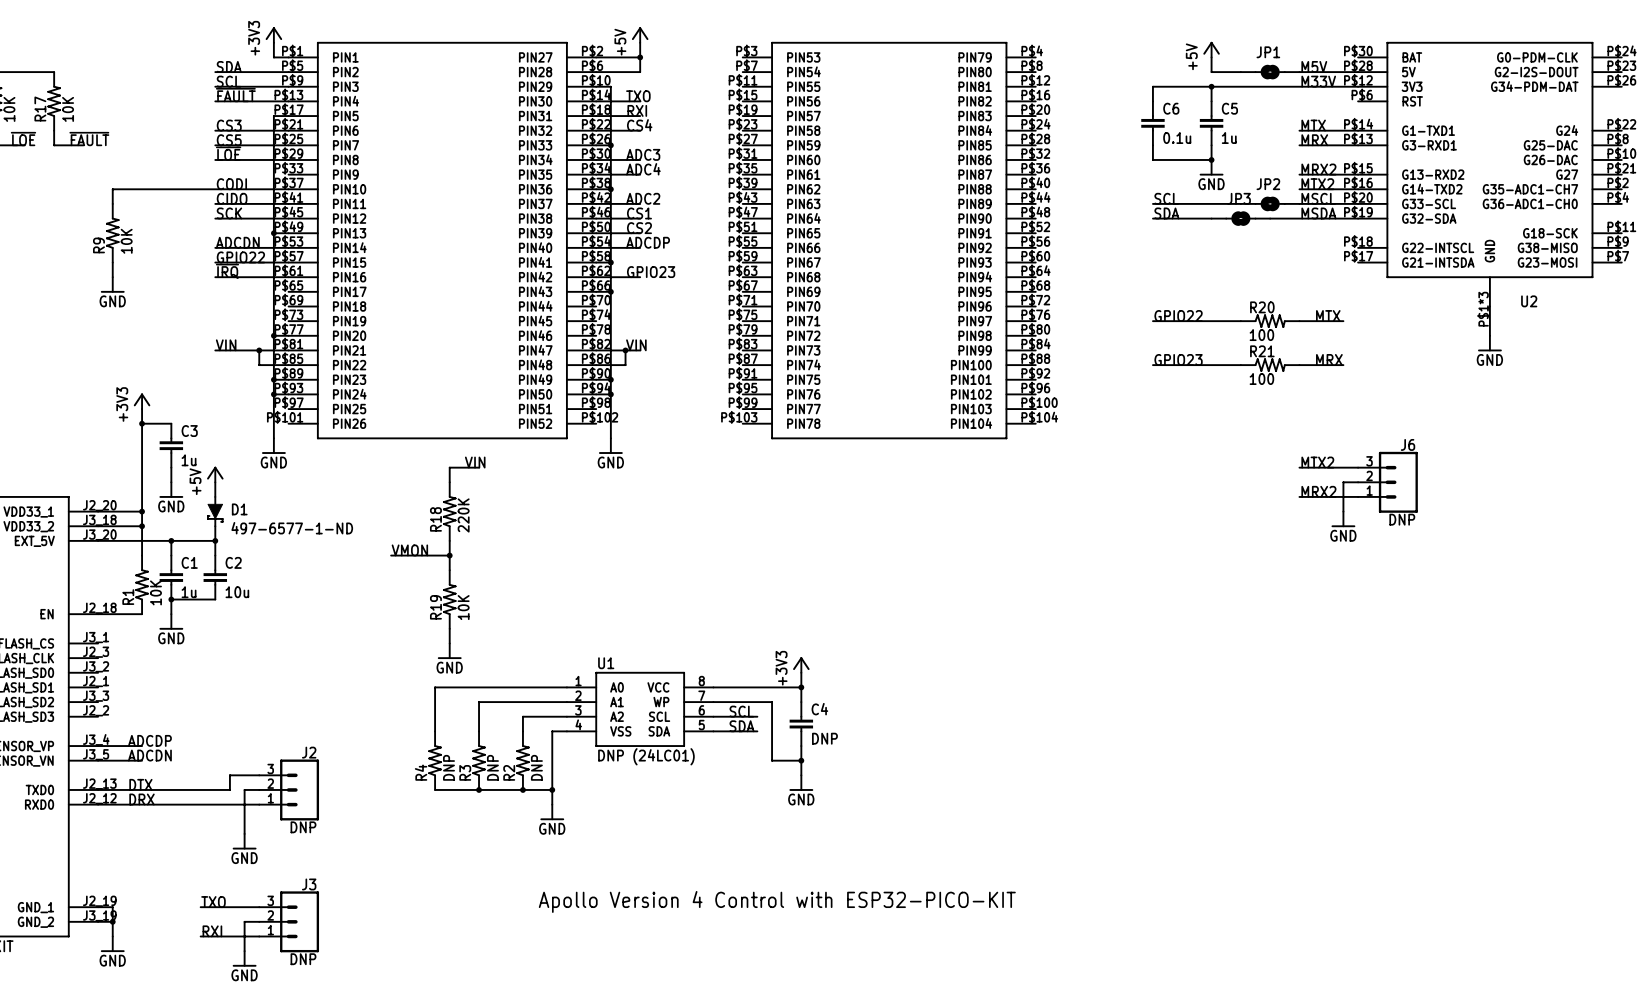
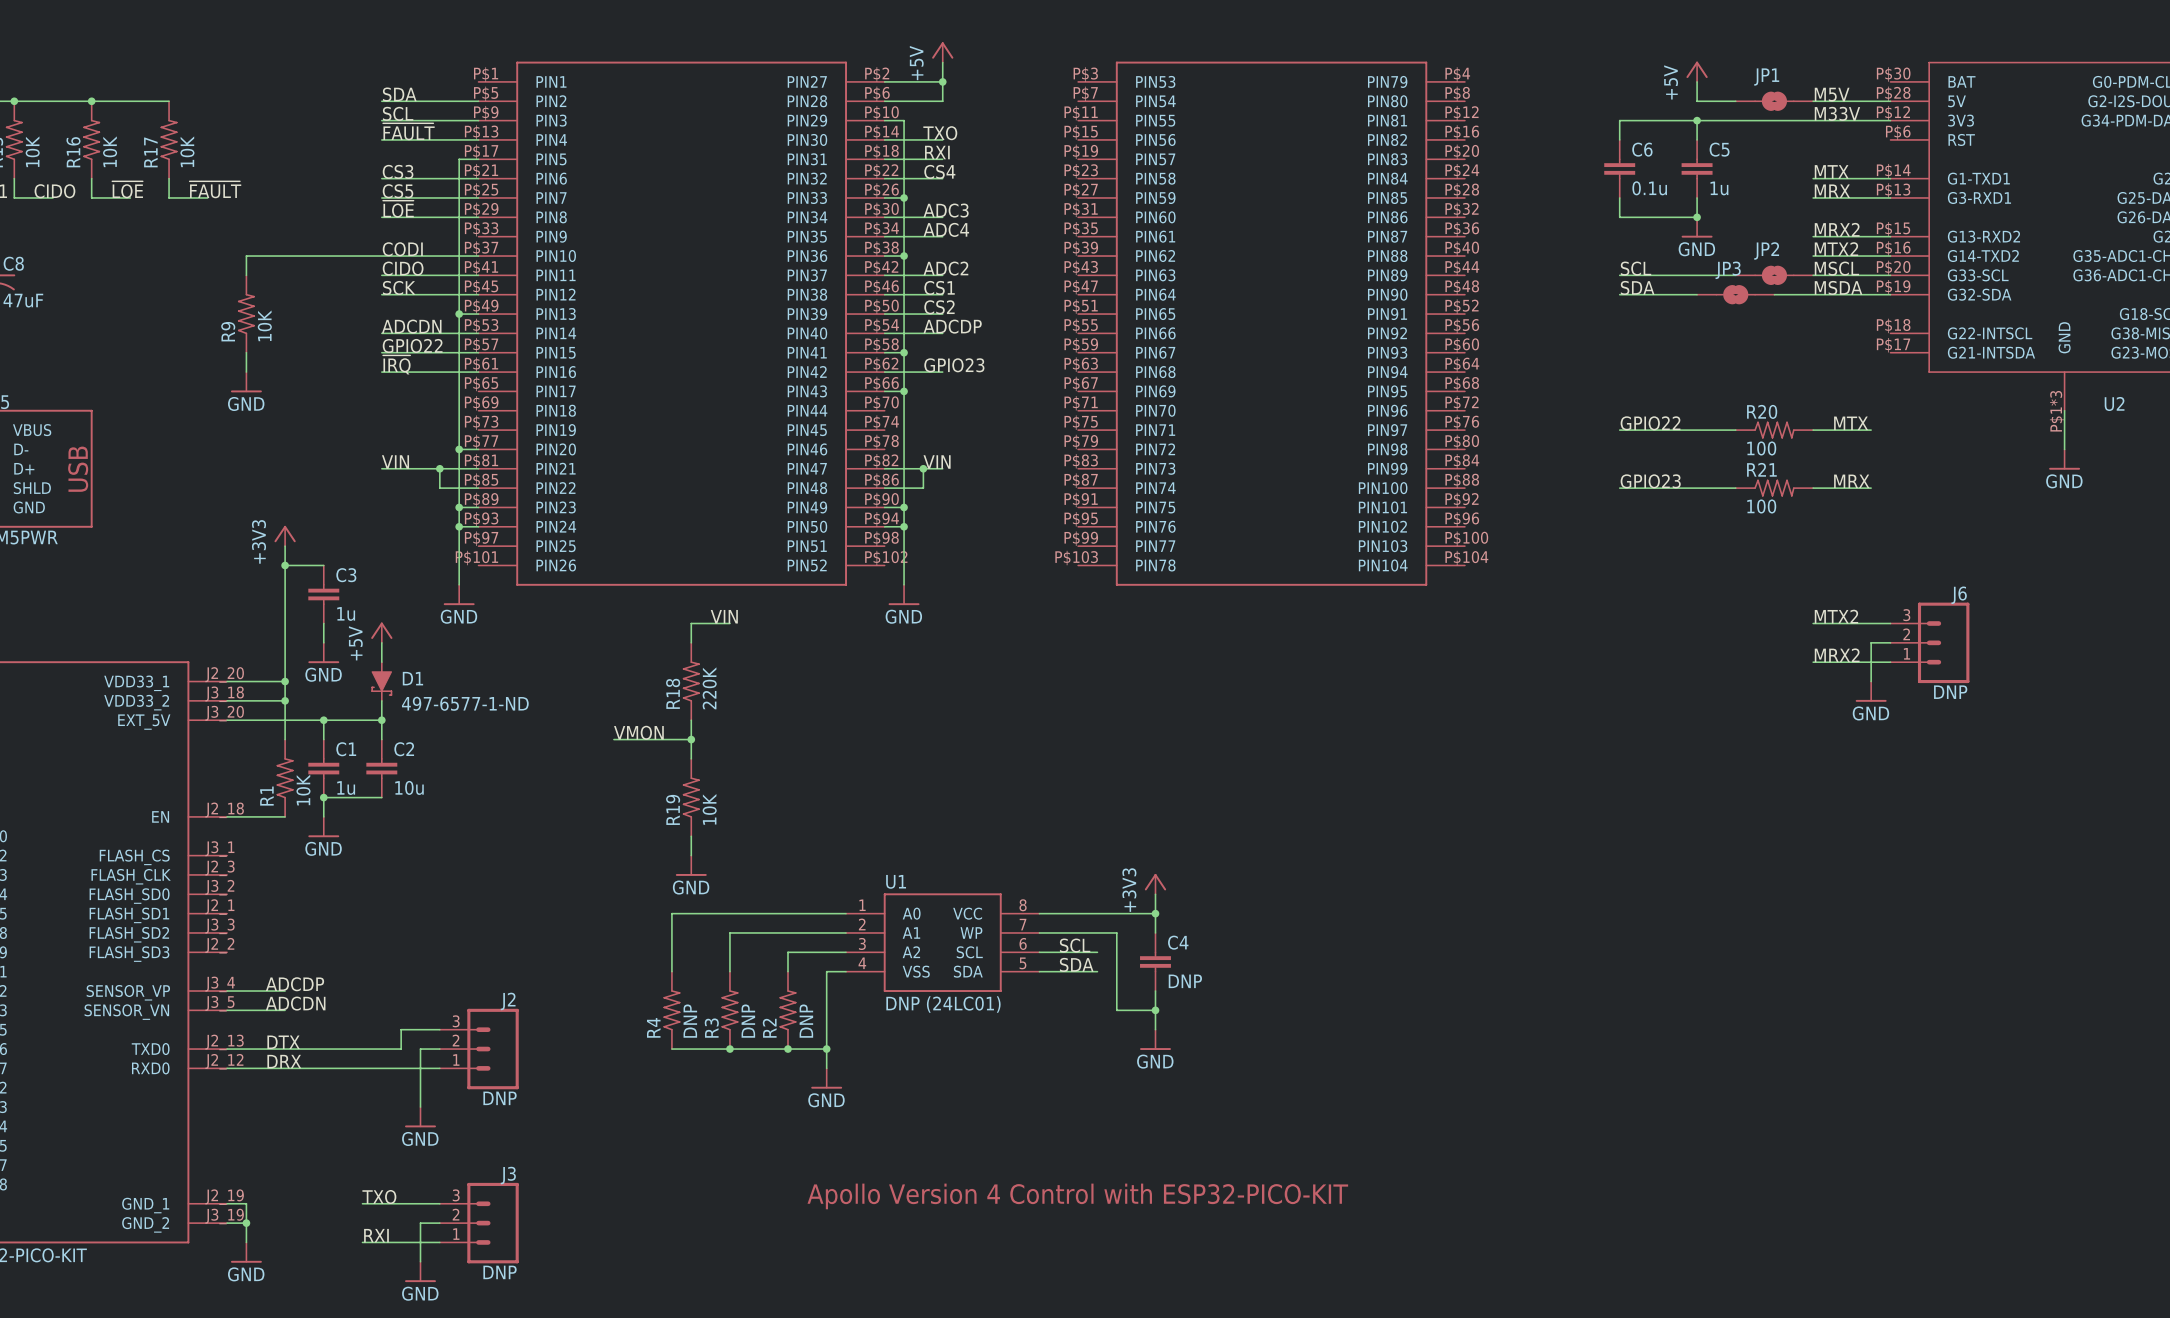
power symbol: +3V3 (273, 35) -> none
wire: (273, 42) (273, 57) (288, 57) -> none

